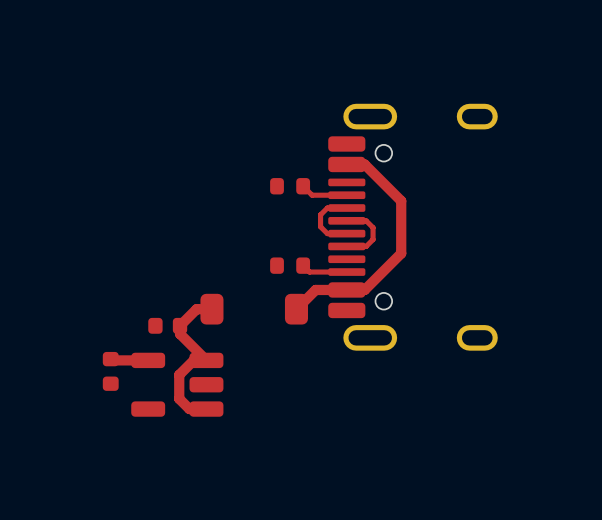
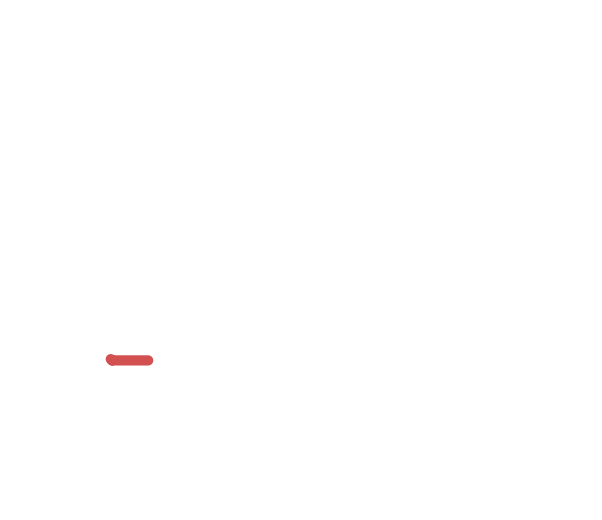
top track: (346, 164) (364, 164) (401, 201) (401, 253) (364, 289) (315, 289) (296, 309) -> none
part: (290, 186) -> none
top track: (303, 186) (312, 195) (346, 195) -> none
top track: (346, 208) (327, 208) (320, 214) (320, 226) (327, 233) (346, 233) -> none
top track: (346, 220) (366, 220) (373, 227) (373, 239) (366, 246) (346, 246) -> none
part: (413, 227) -> none
part: (290, 265) -> none
top track: (303, 265) (309, 272) (346, 272) -> none
top track: (211, 309) (196, 309) (180, 325) (180, 333) (206, 360) (193, 360) (179, 374) (179, 398) (189, 409) (206, 409) -> none
part: (254, 309) -> none
part: (167, 325) -> none
part: (110, 371) -> none
part: (177, 384) -> none

